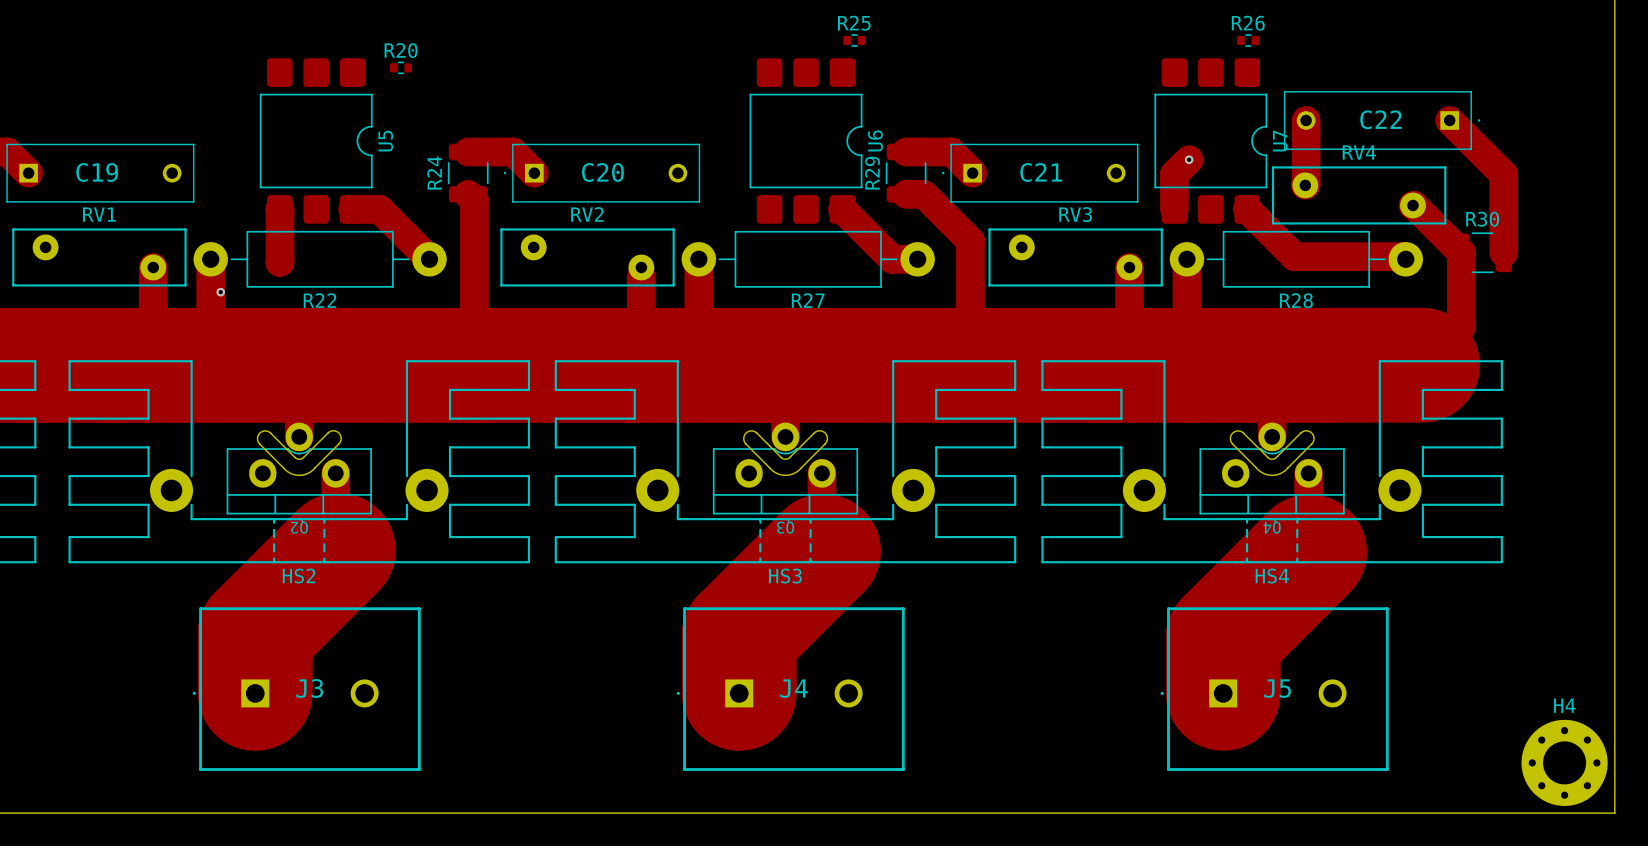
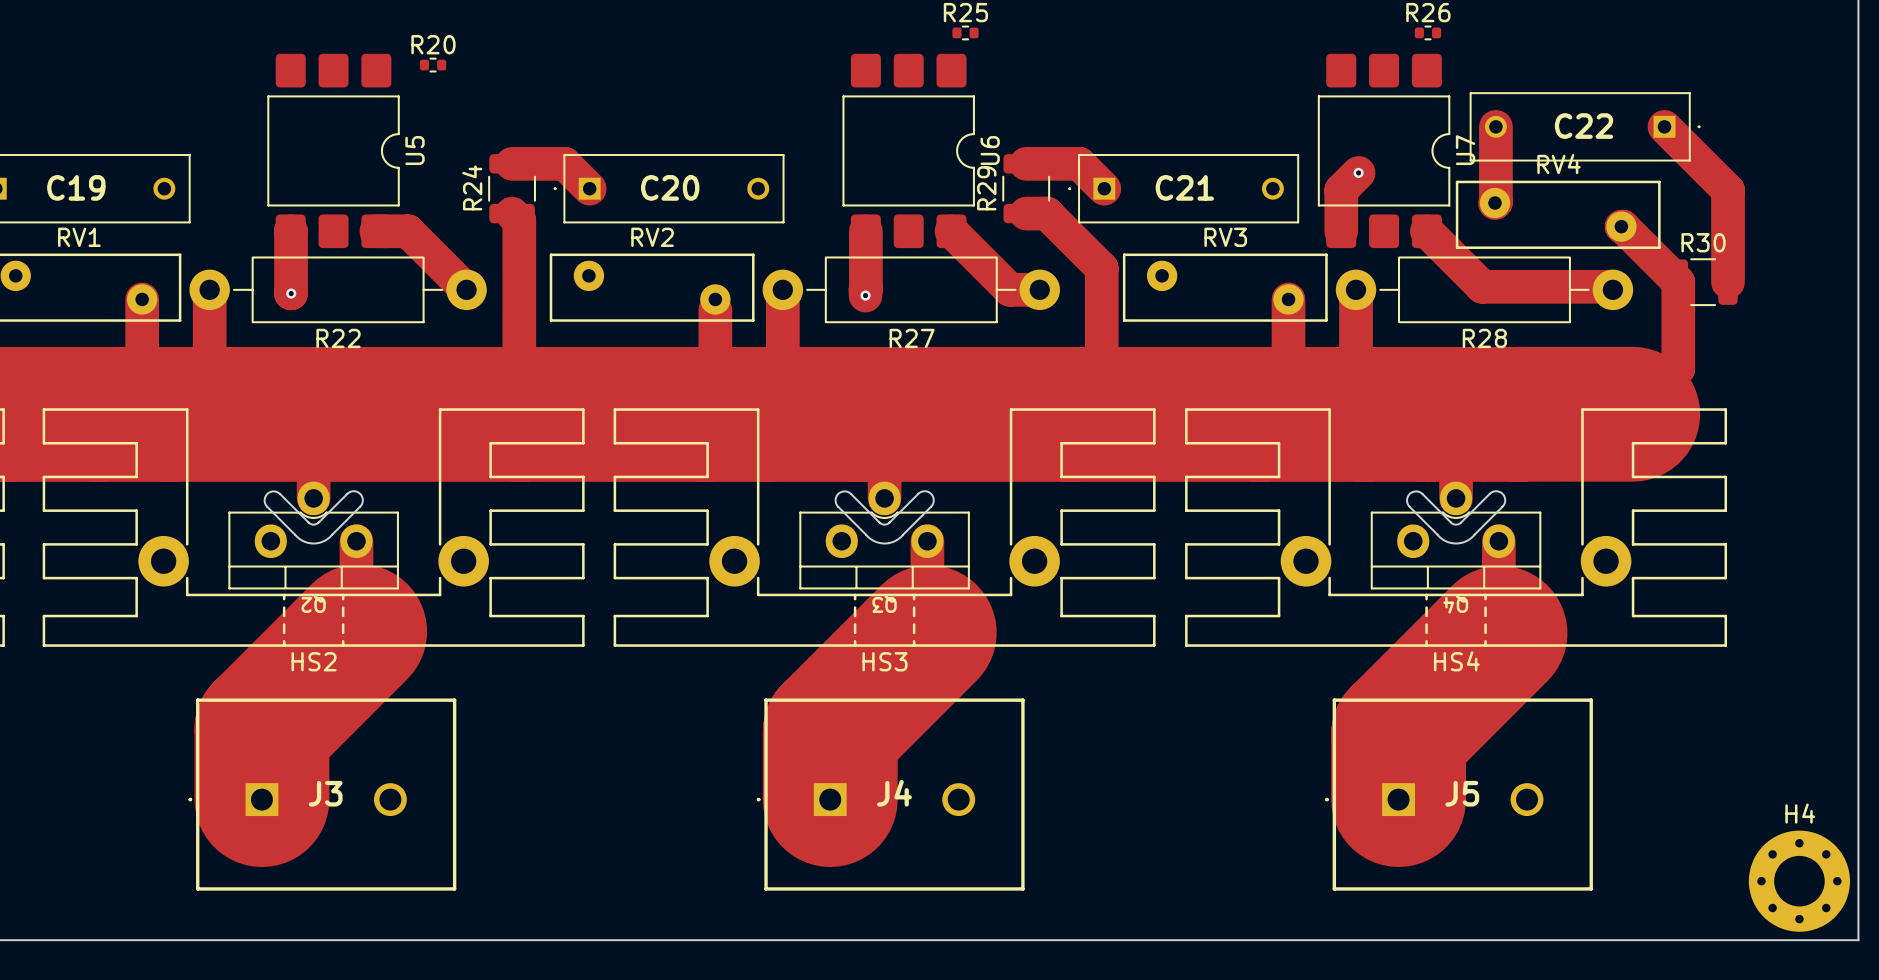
track: none -> (865, 231) (865, 295)
via: none -> (865, 295)
via position: (220, 292) -> (291, 293)

